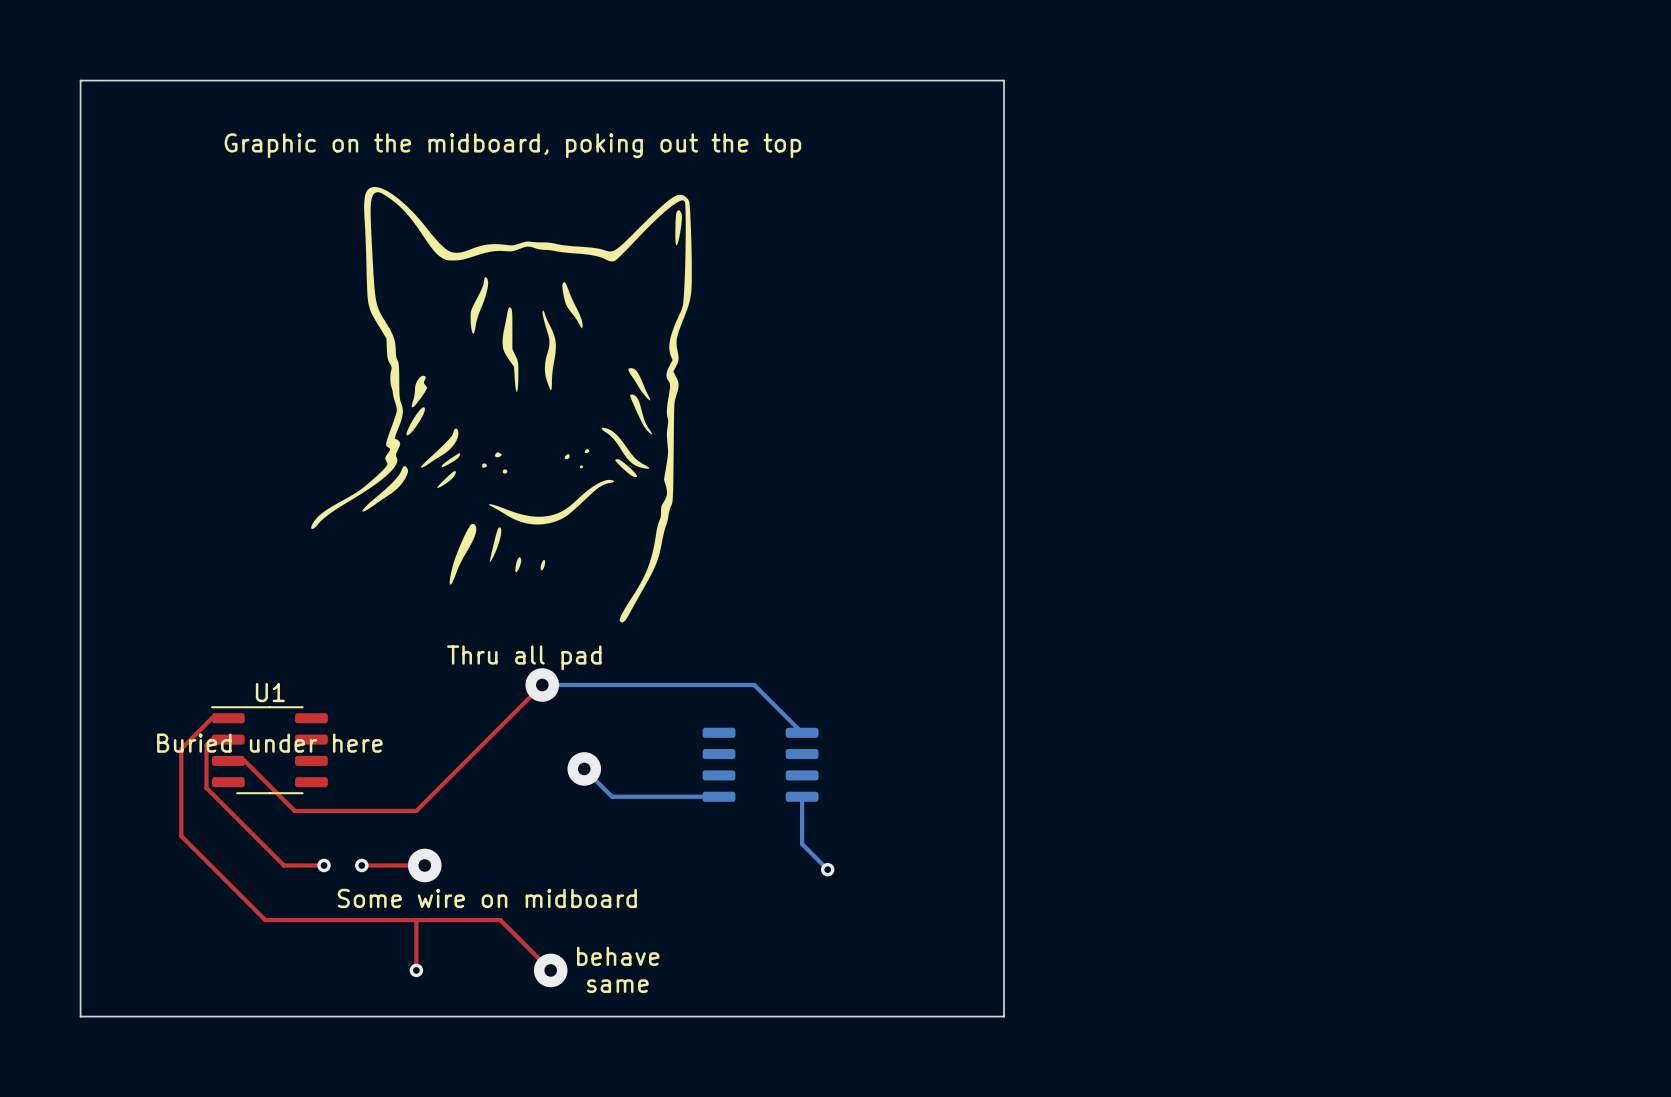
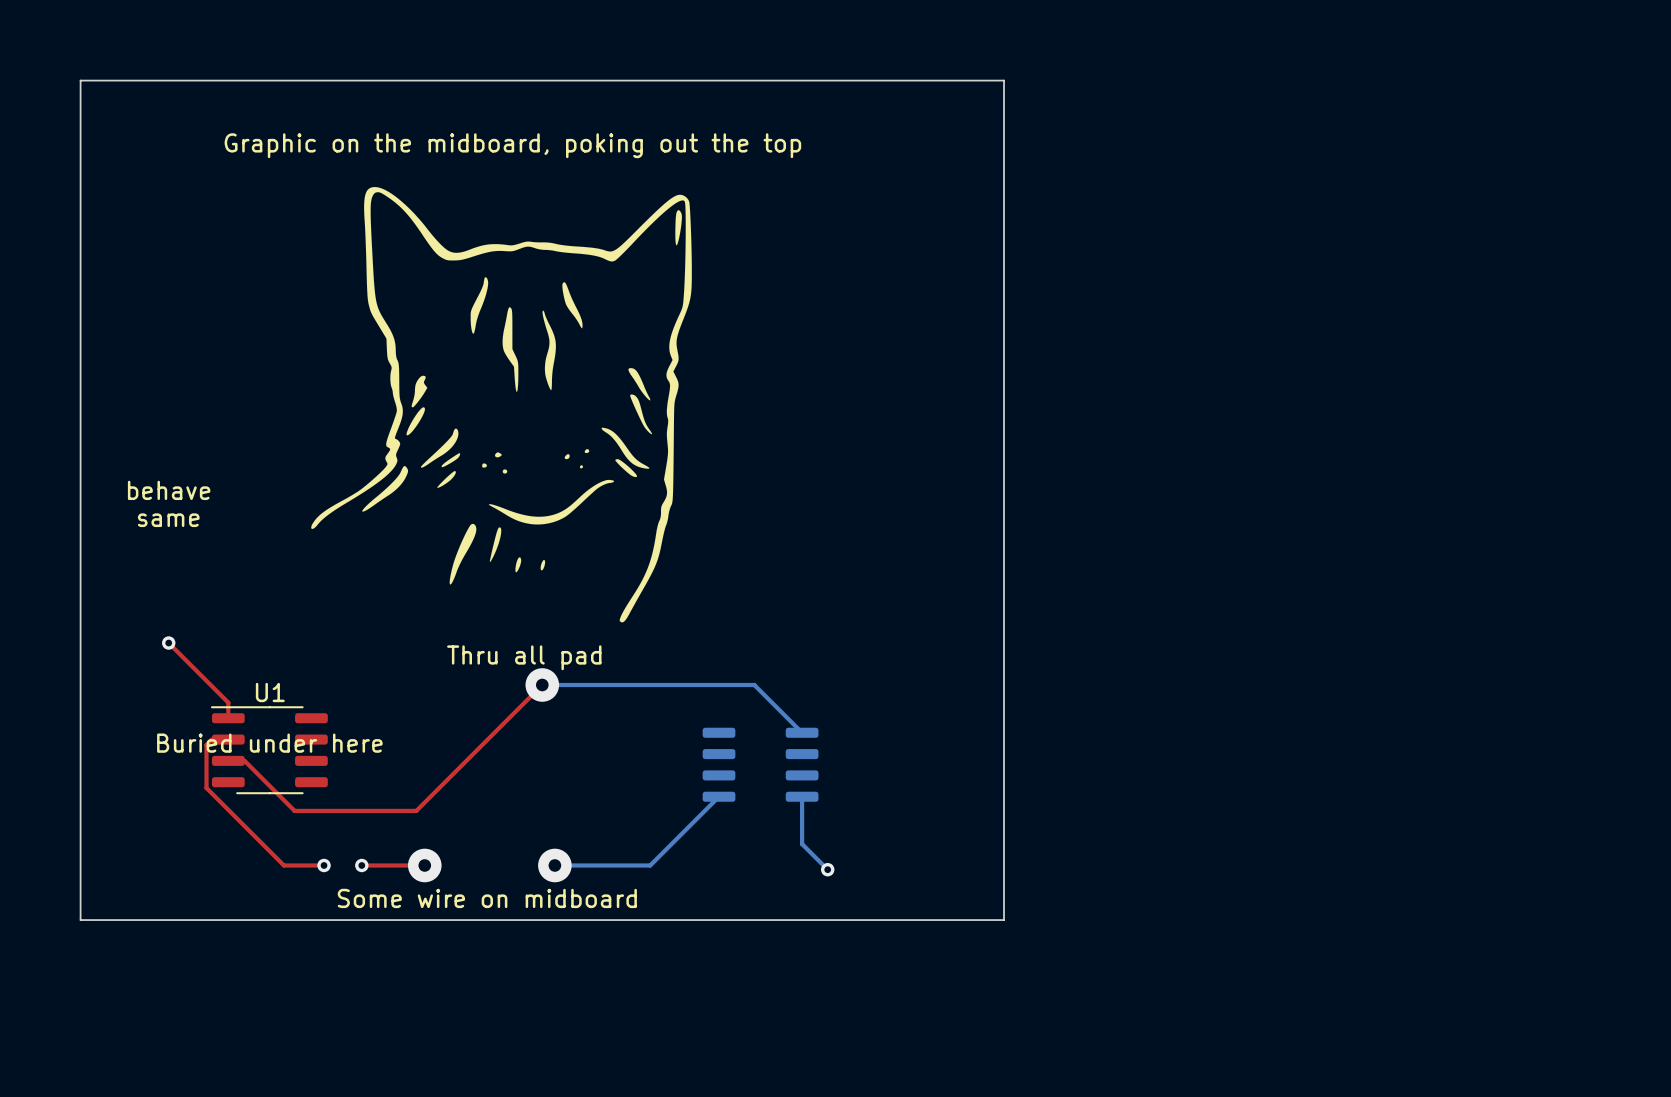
text: none -> behave (169, 490)
text: none -> same (168, 520)
via: none -> (168, 643)
top track: (228, 718) (211, 718) (181, 748) (181, 836) (265, 920) (500, 920) (550, 970) -> (228, 718) (228, 702) (168, 643)
bottom track: (584, 768) (612, 796) (719, 796) -> (554, 865) (650, 865) (719, 796)
via: (584, 768) -> none
via: none -> (554, 865)
board edge: (80, 920) (80, 1016) (1004, 1016) (1004, 920) -> (80, 920) (1004, 920)
top track: (416, 920) (416, 970) -> none
text: behave (618, 956) -> none
via: (416, 970) -> none
via: (550, 970) -> none
text: same (617, 986) -> none

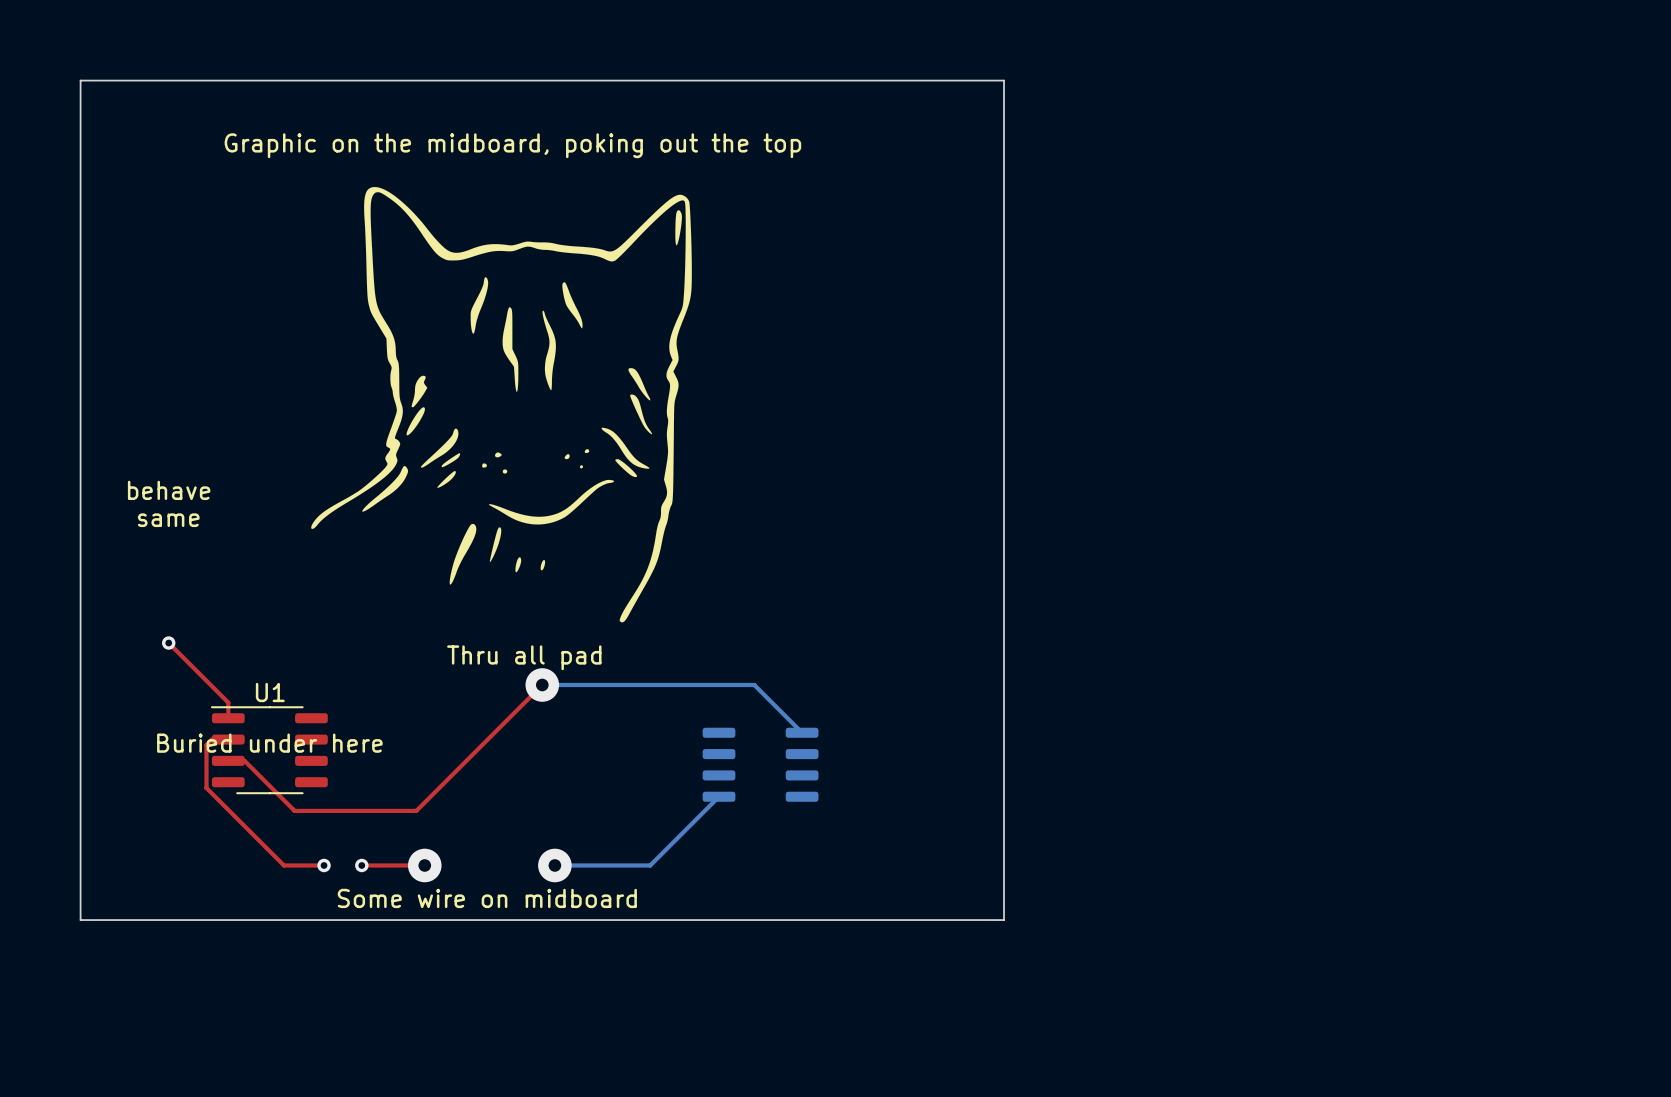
bottom track: (802, 796) (802, 844) (827, 869) -> none
via: (827, 869) -> none

